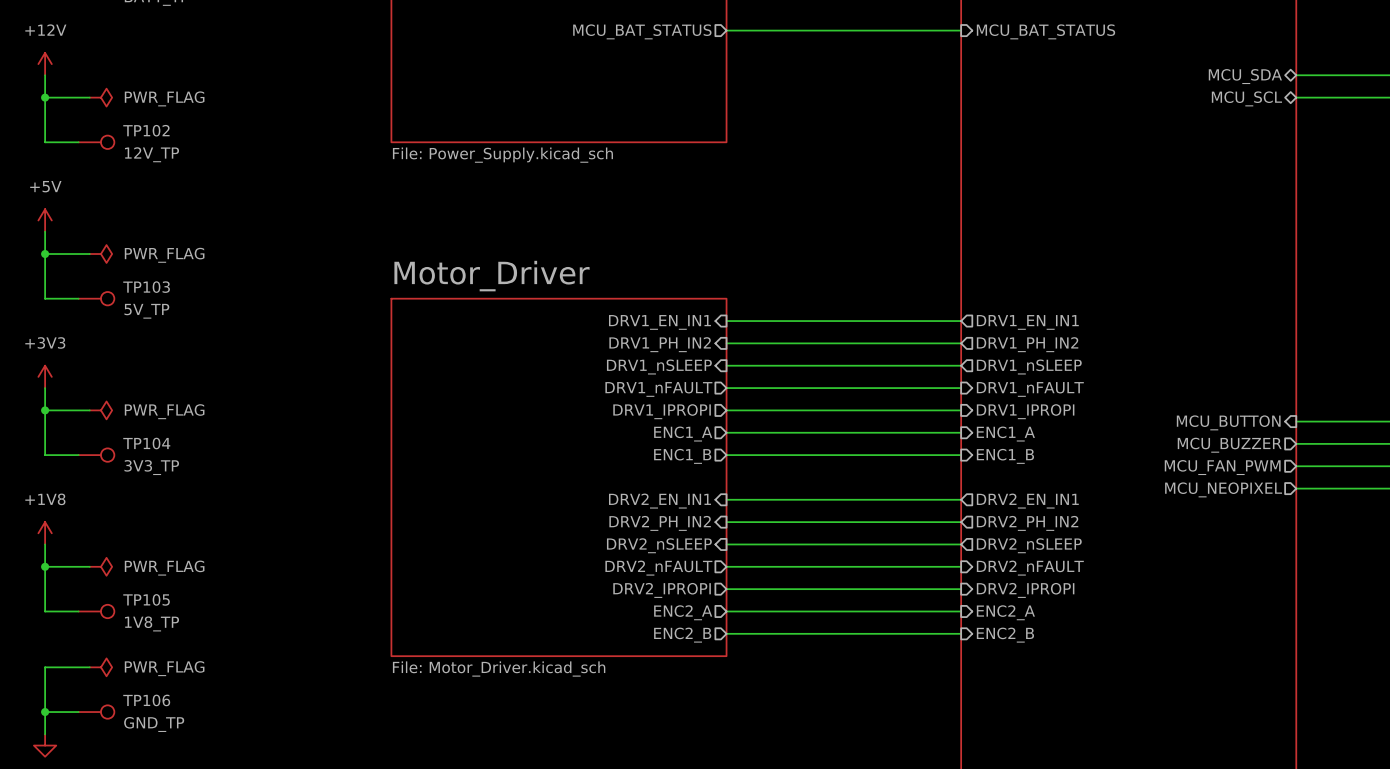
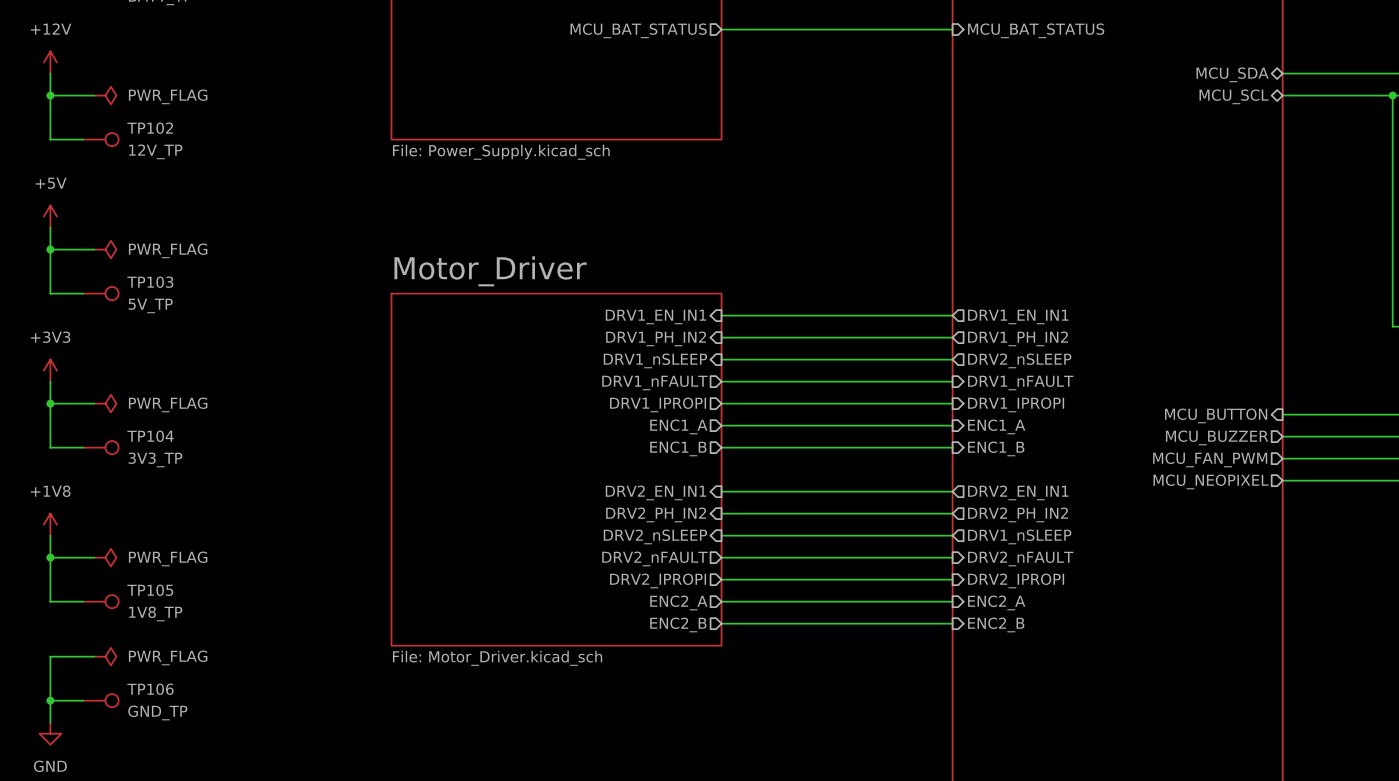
sheet pin: DRV1_nSLEEP (1029, 367) -> DRV2_nSLEEP (1019, 360)
sheet pin: DRV2_nSLEEP (1029, 545) -> DRV1_nSLEEP (1019, 536)

